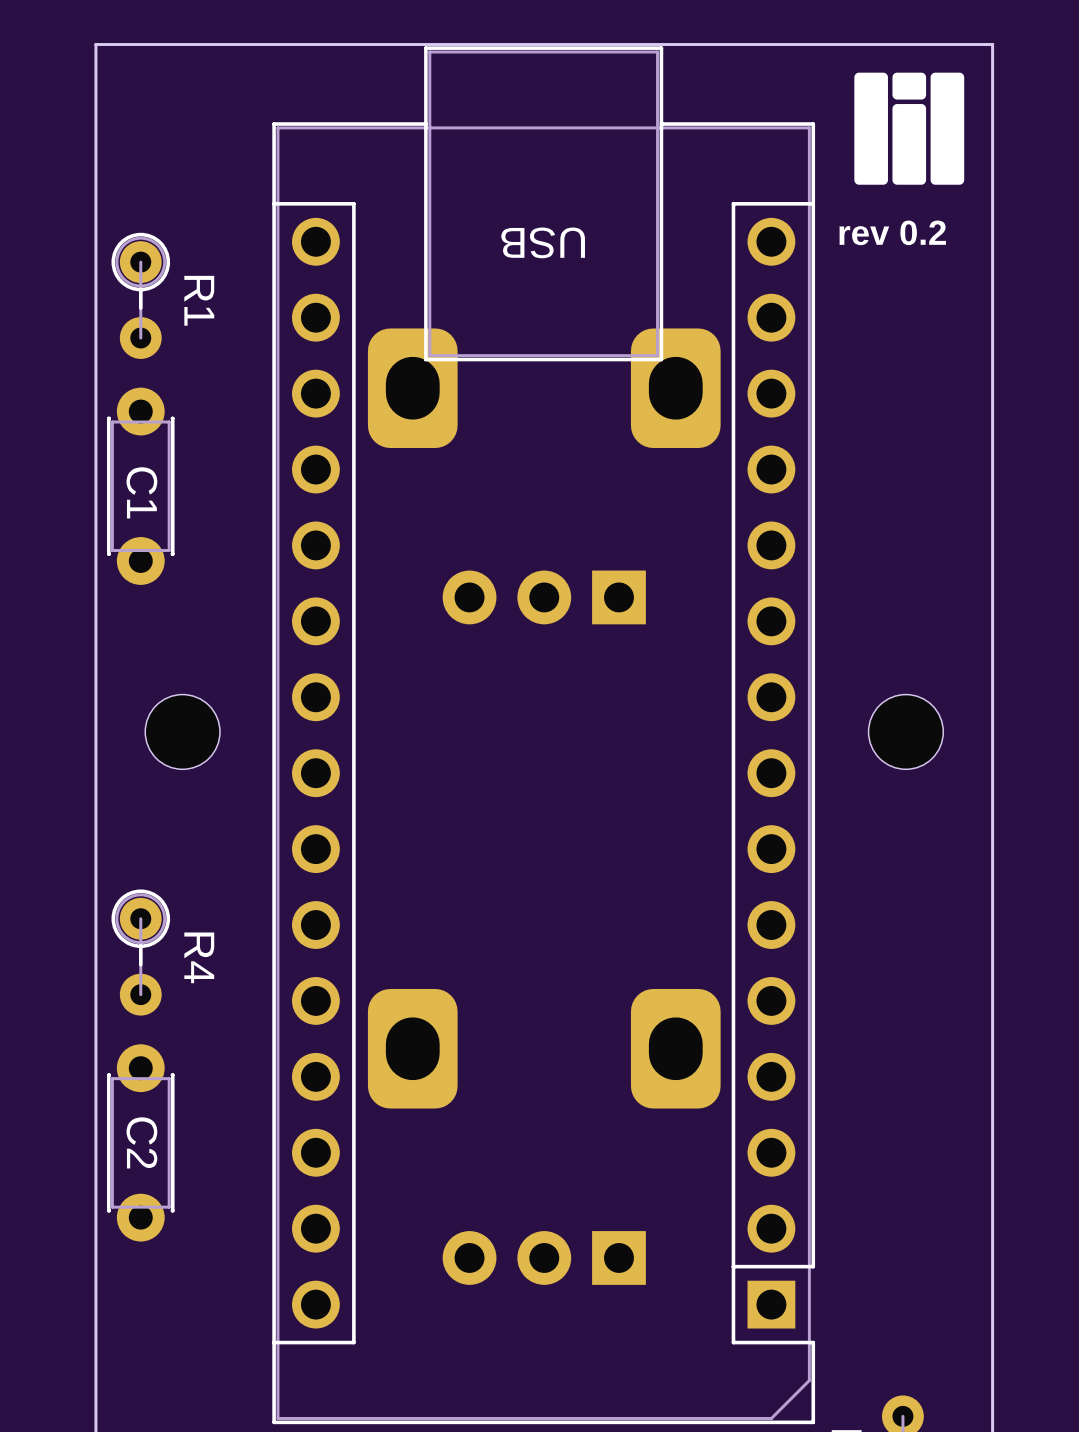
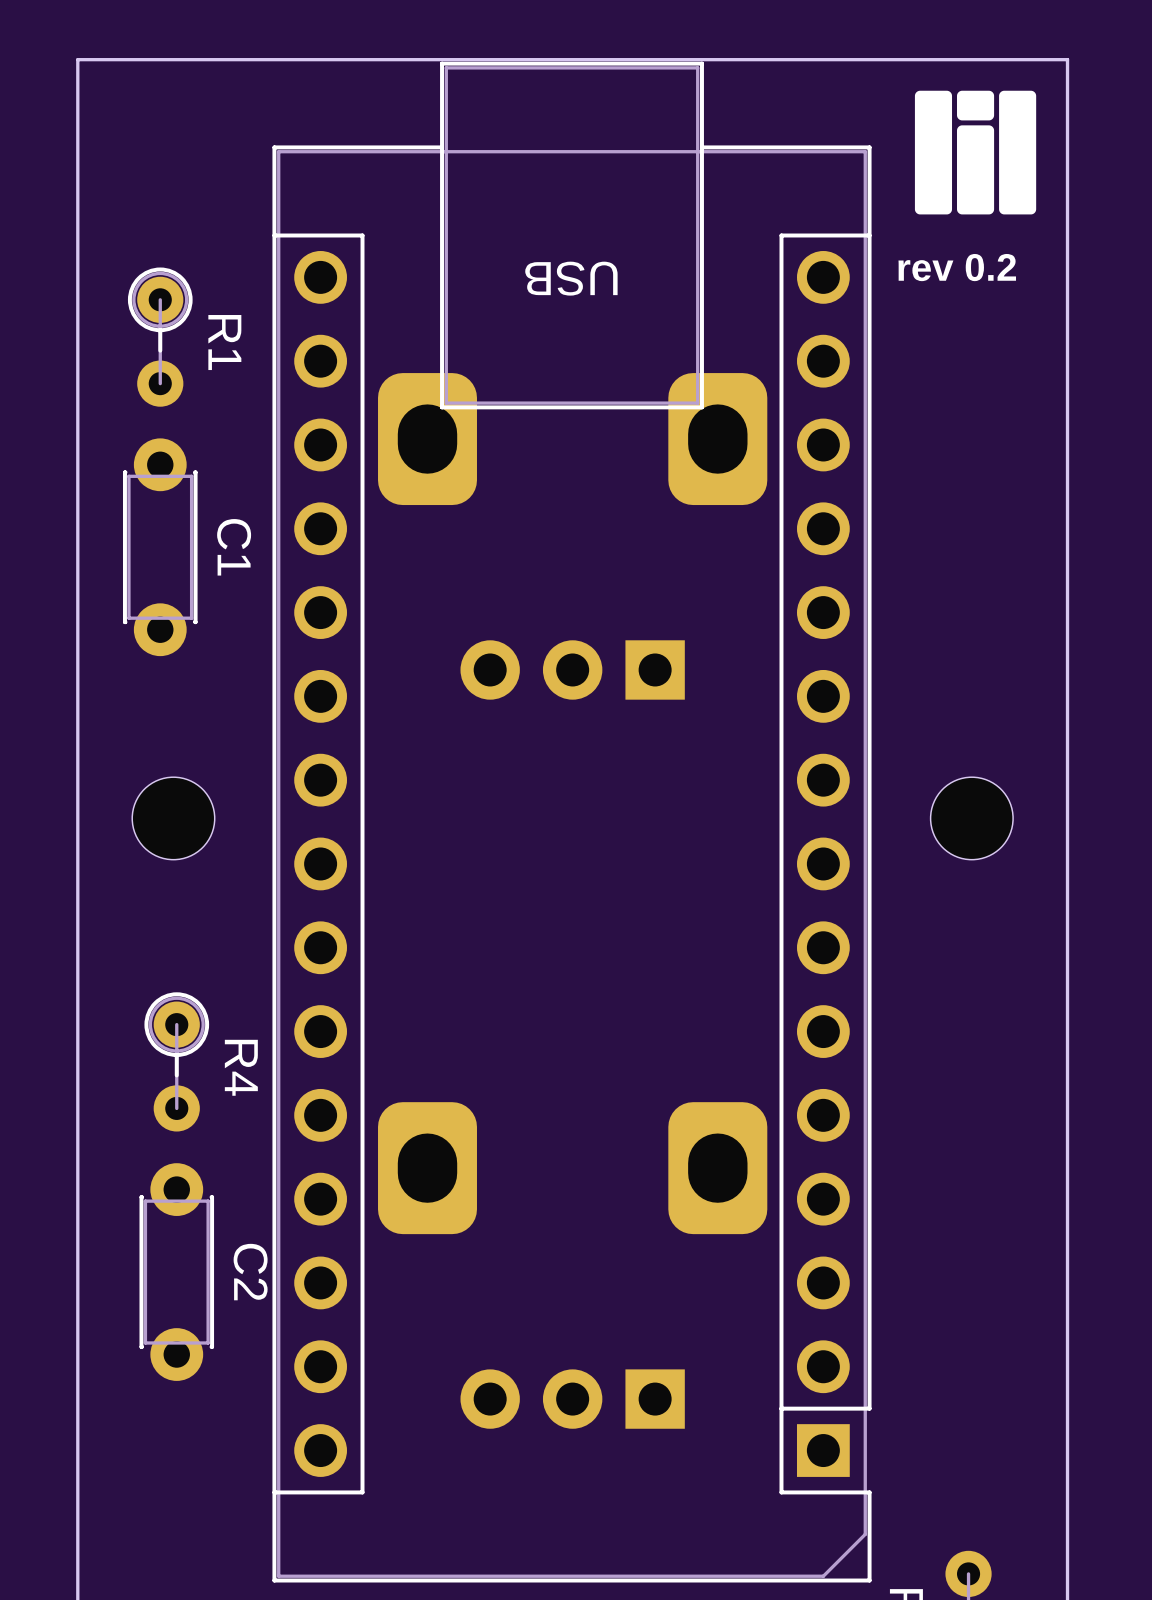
R1 position: (140, 295) -> (160, 337)
C1 position: (140, 486) -> (160, 547)
C1 name position: C1 (141, 492) -> C1 (234, 547)
R4 position: (140, 952) -> (176, 1061)
C2 position: (140, 1142) -> (176, 1272)
C2 name position: C2 (141, 1142) -> C2 (250, 1272)

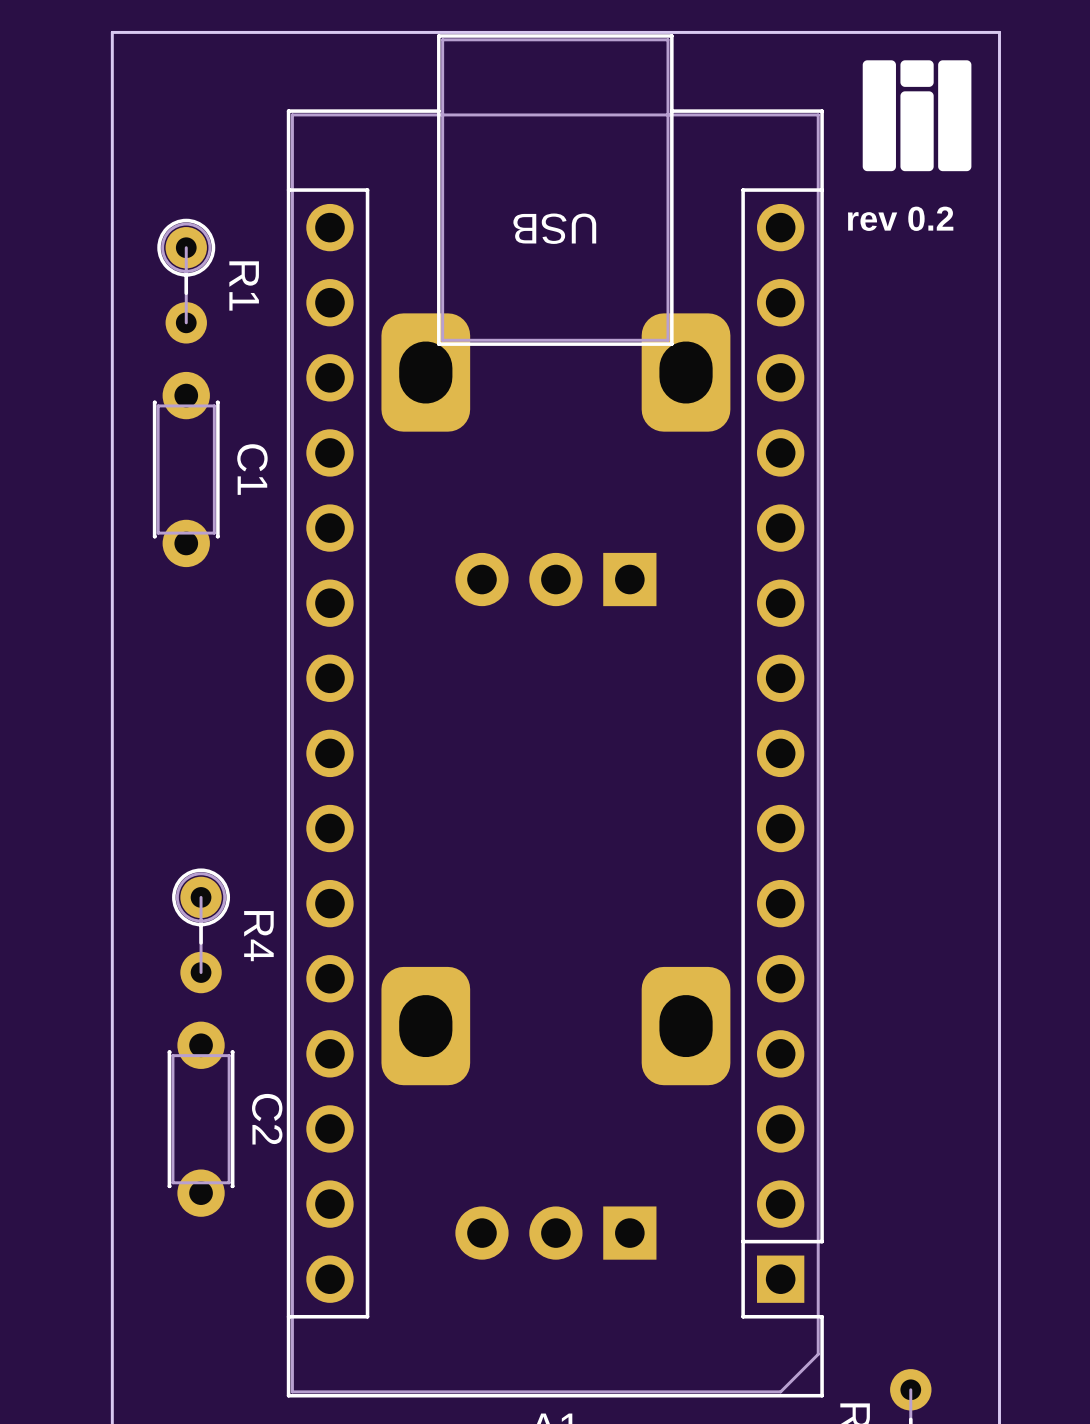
part: (173, 818) -> none
part: (971, 818) -> none

